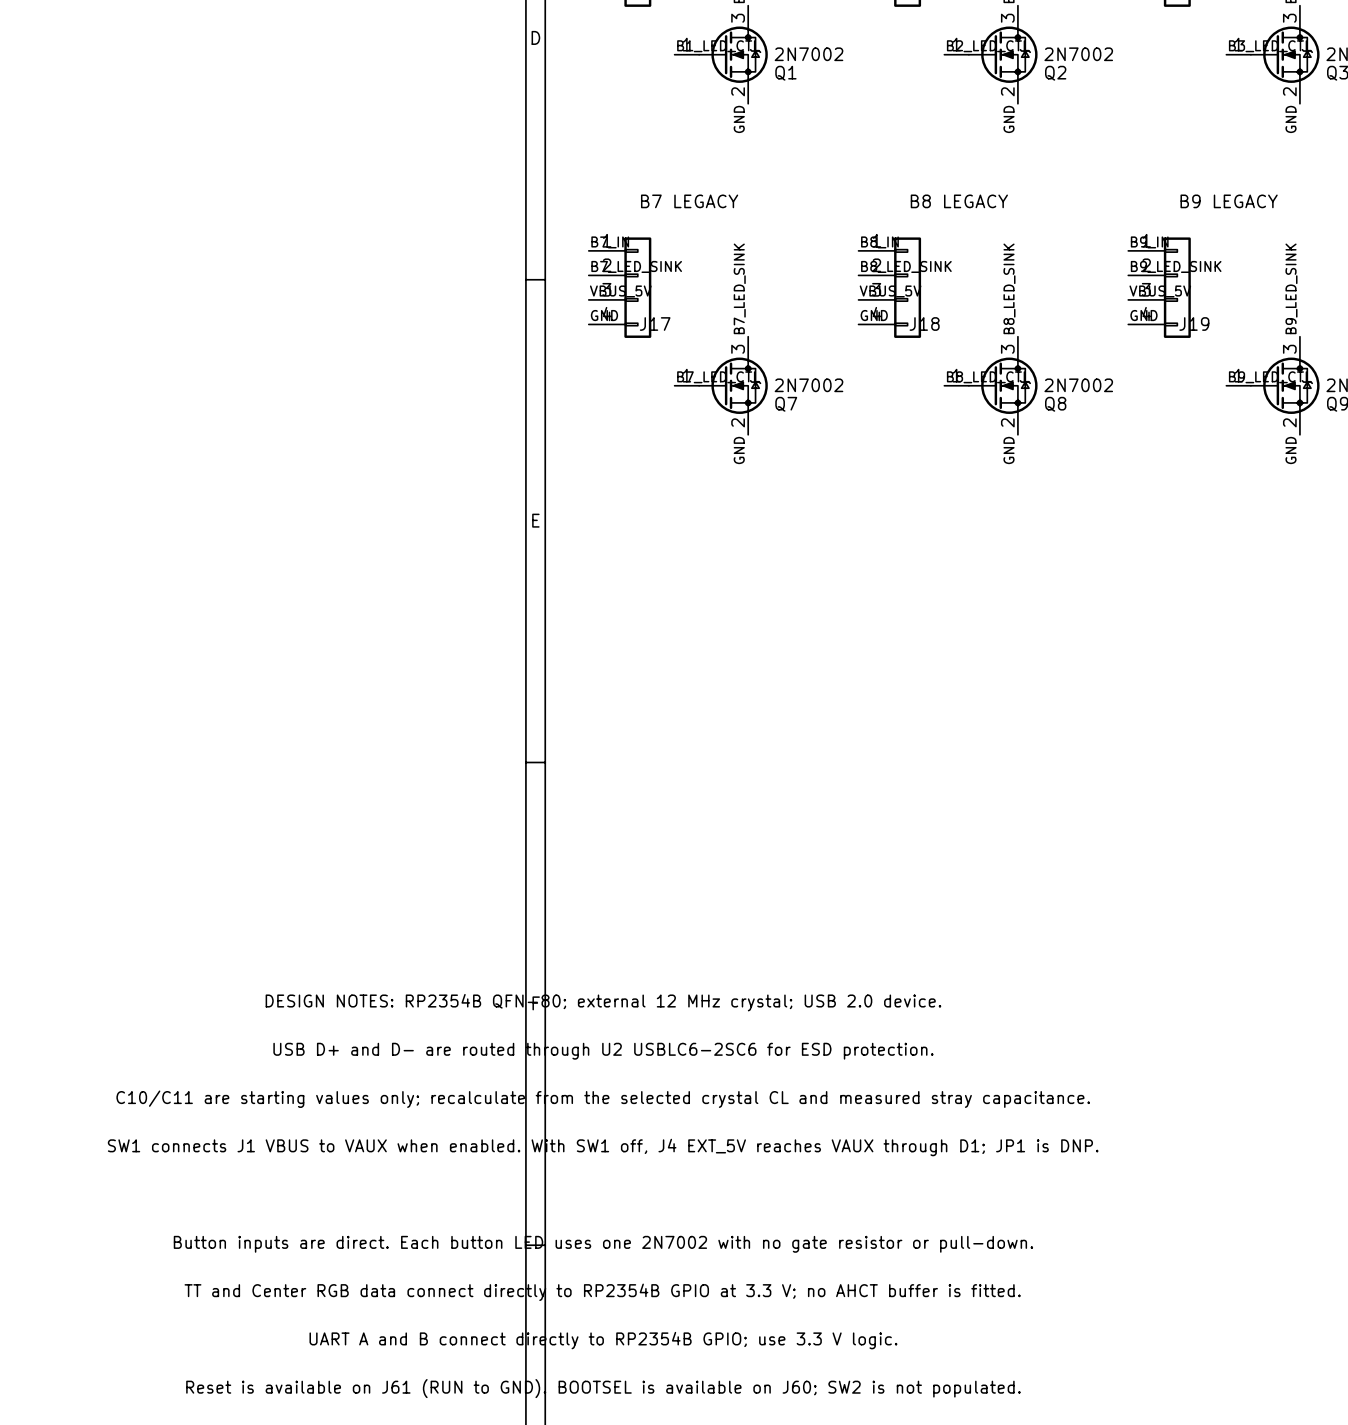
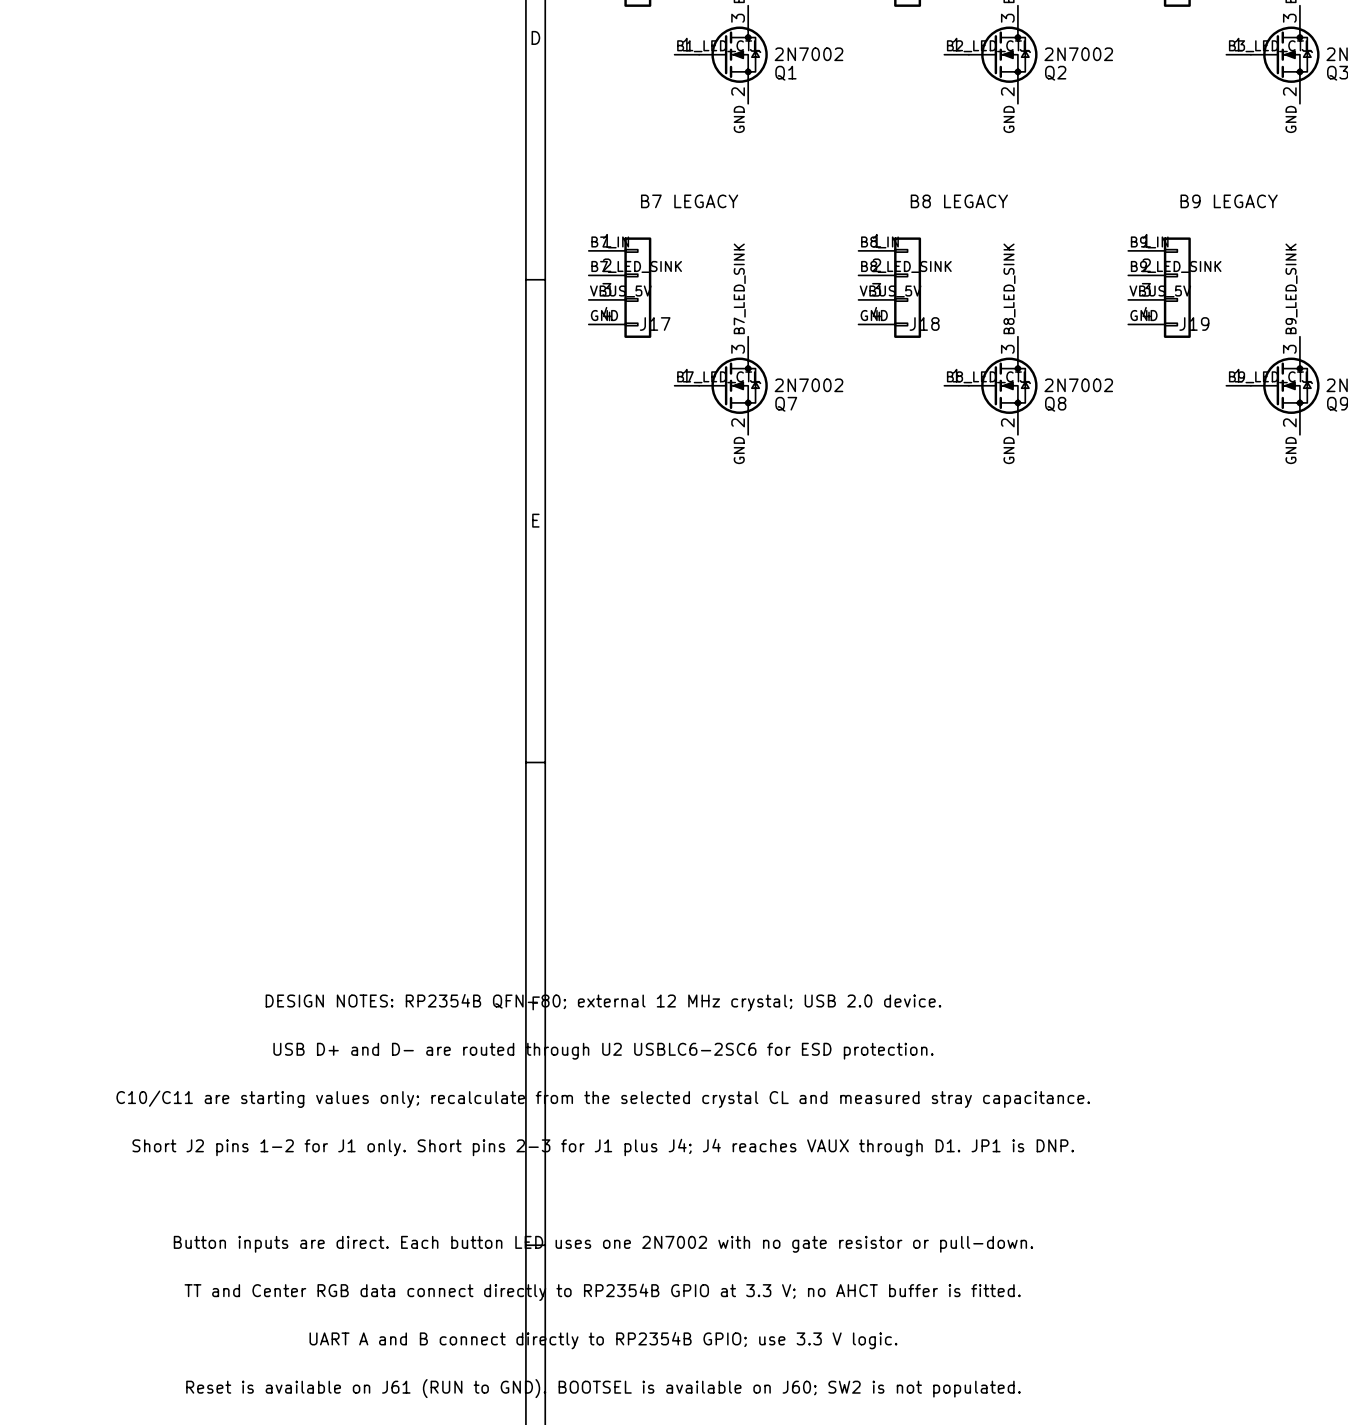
text: SW1 connects J1 VBUS to VAUX when enabled. With SW1 off, J4 EXT_5V reaches VAUX through D1; JP1 is DNP. (603, 1147) -> Short J2 pins 1-2 for J1 only. Short pins 2-3 for J1 plus J4; J4 reaches VAUX through D1. JP1 is DNP. (603, 1147)

